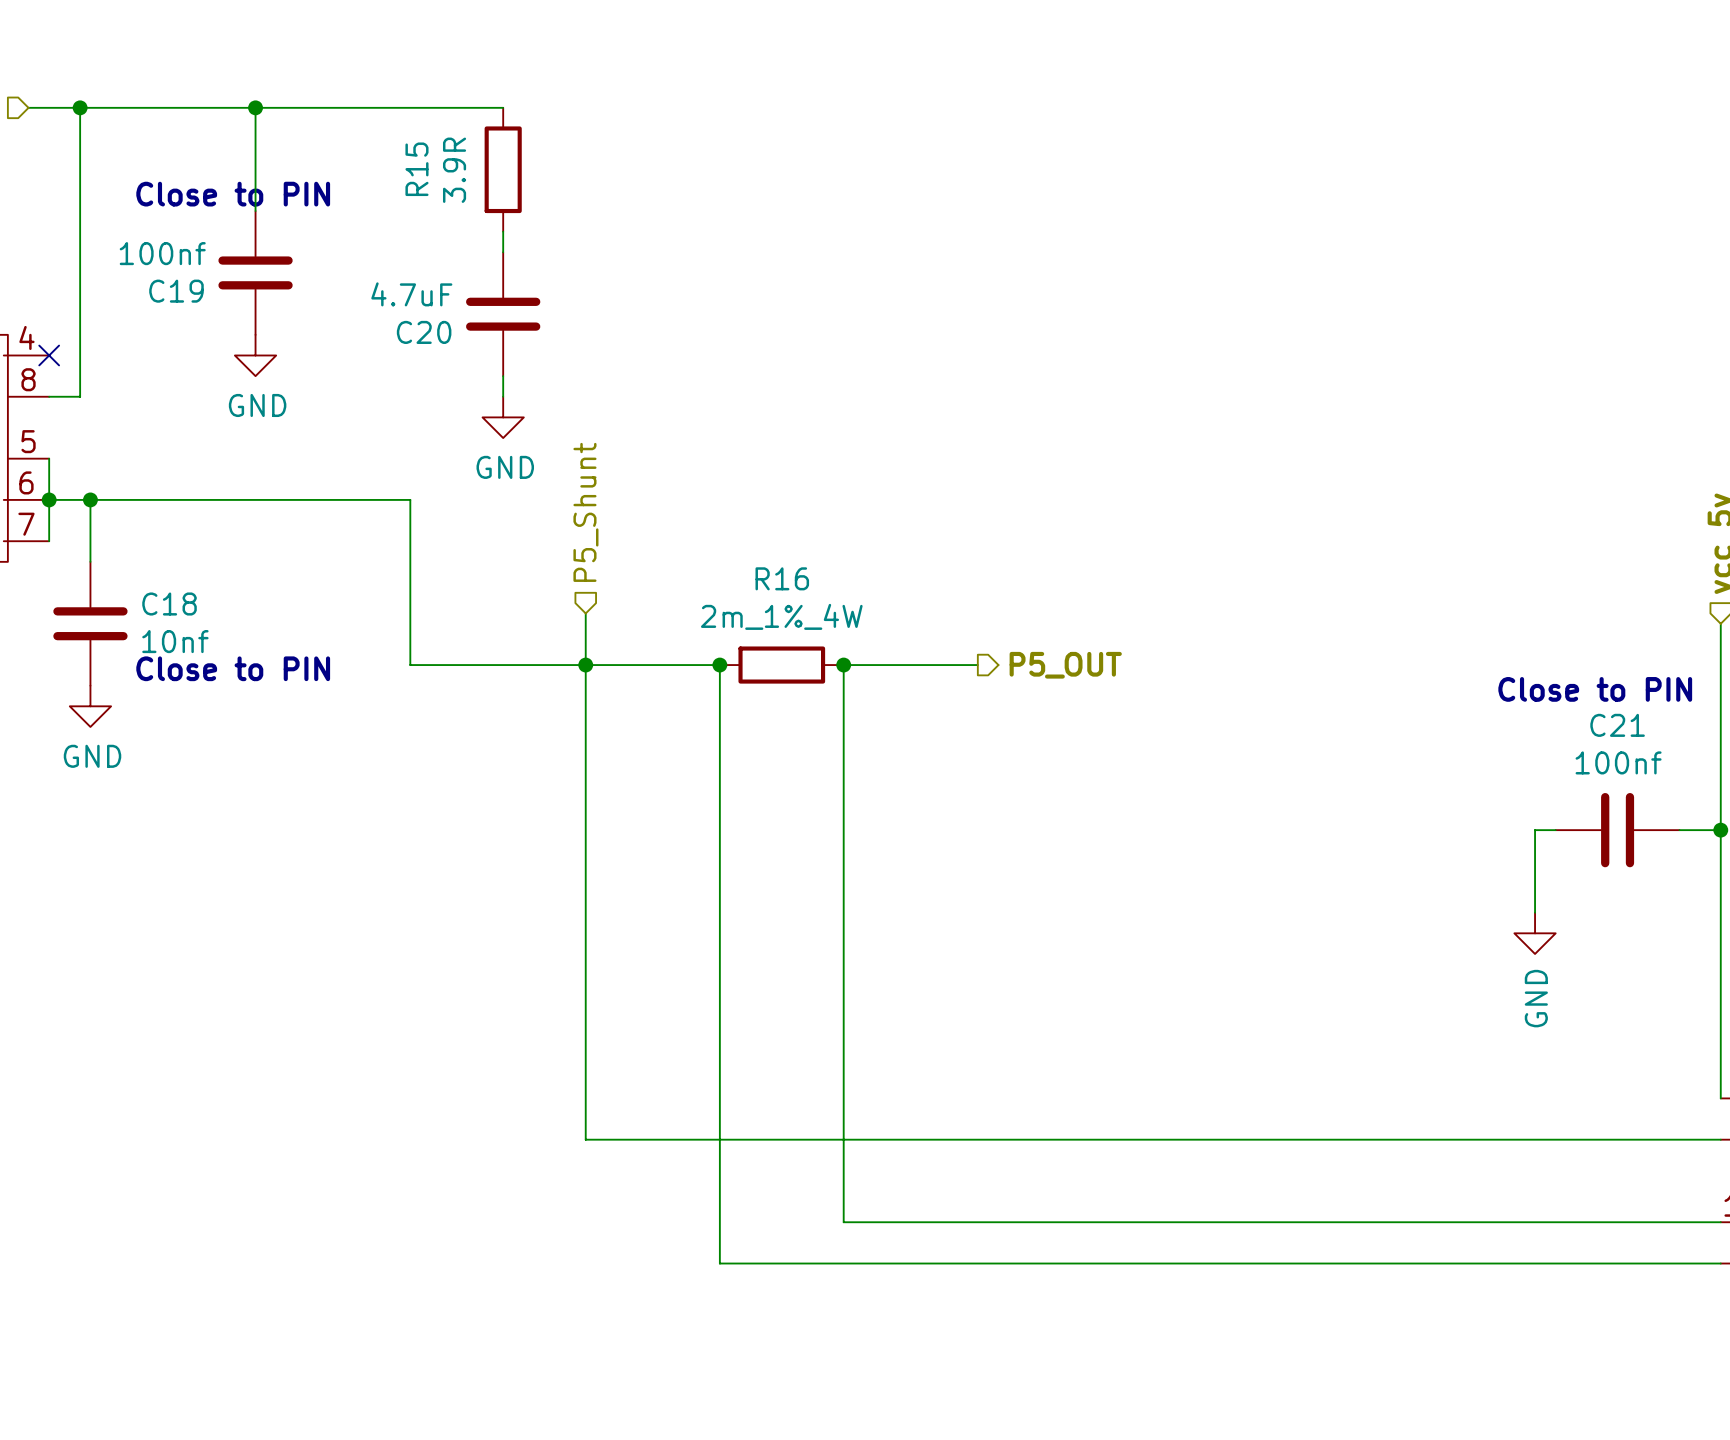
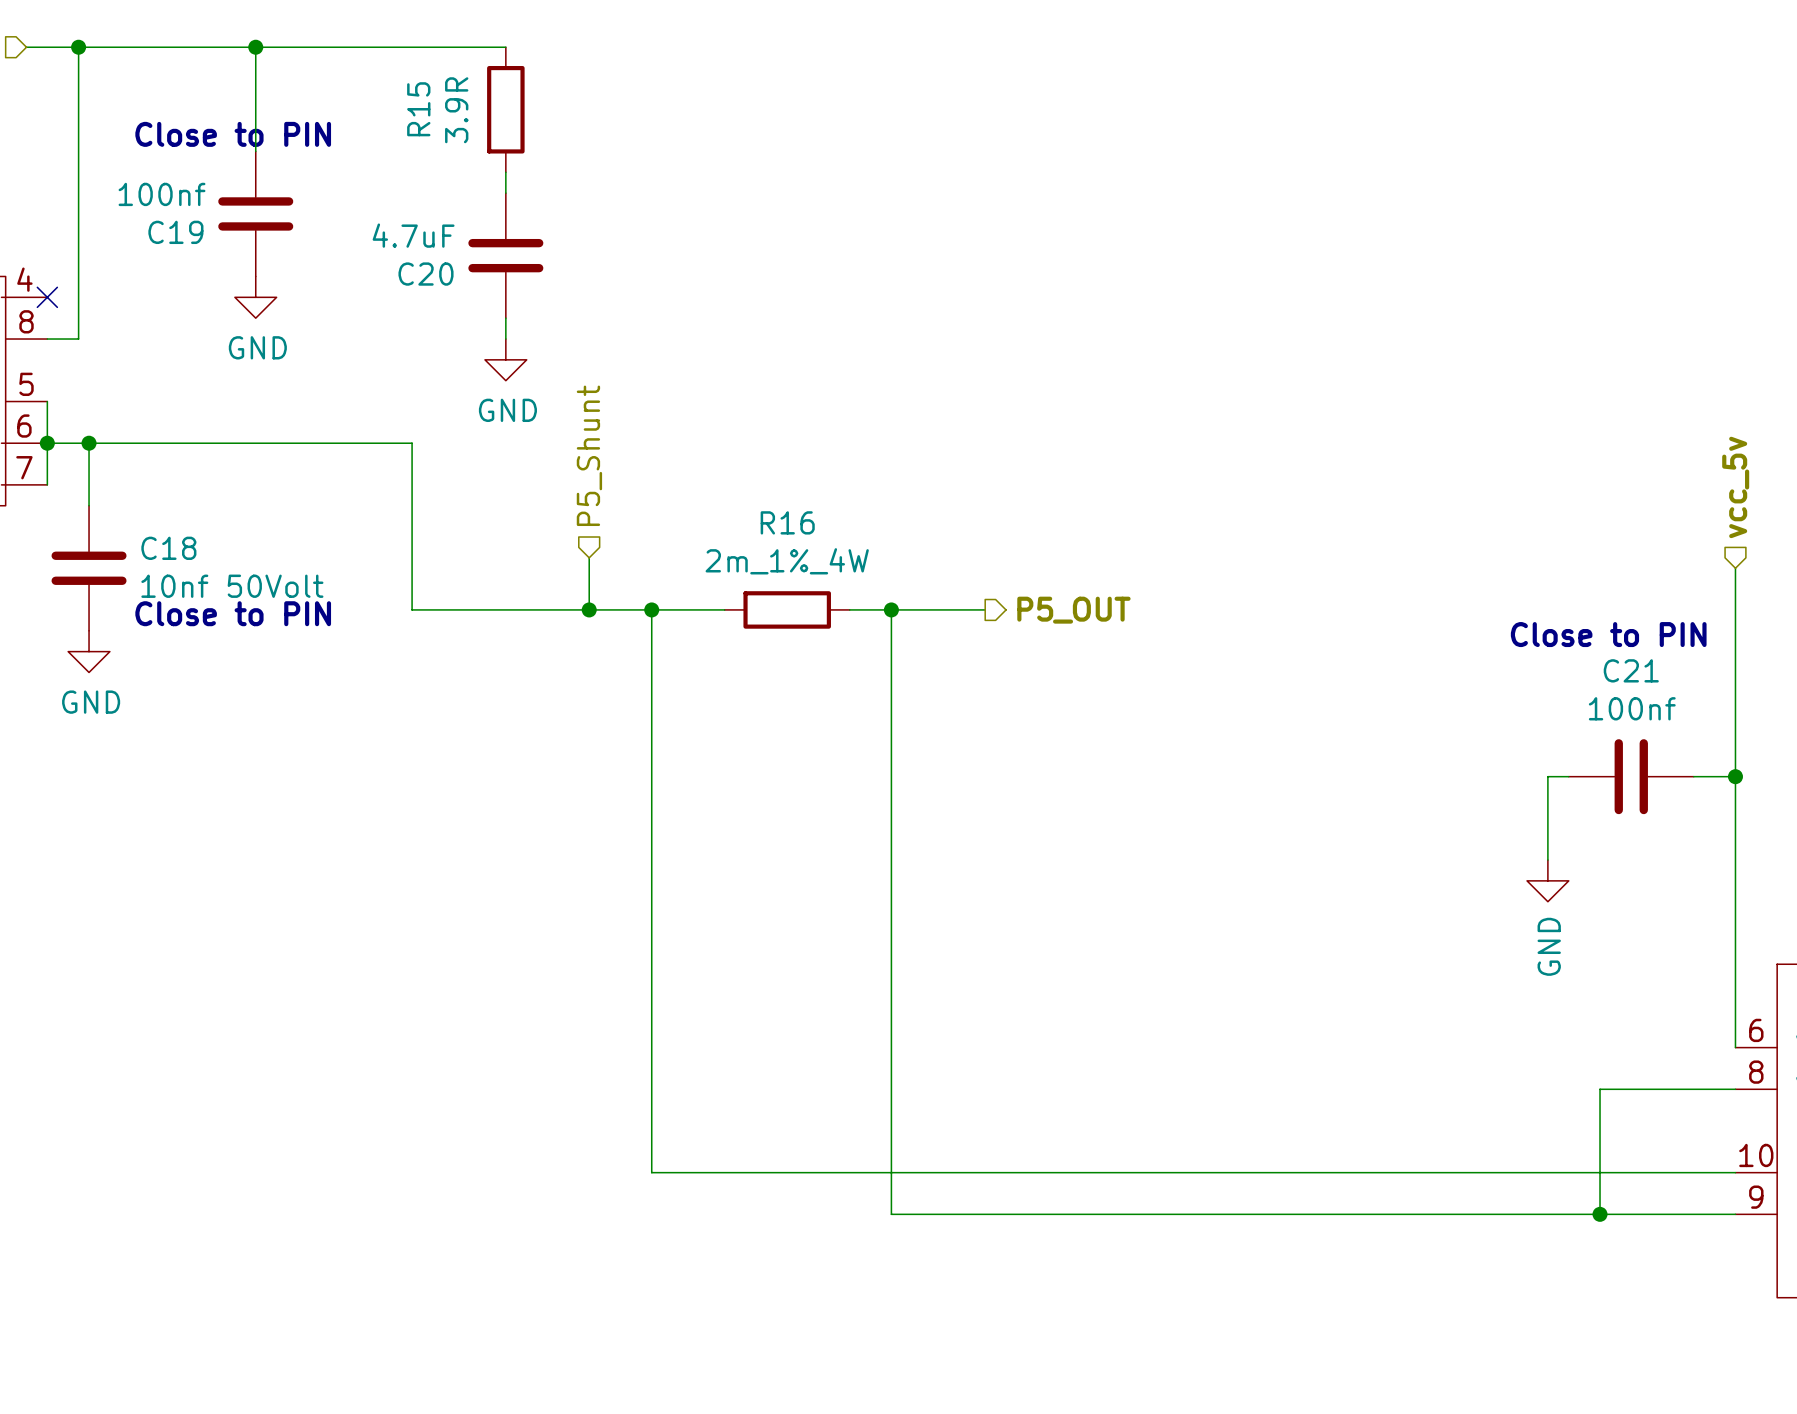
C18 value: 10nf (175, 641) -> 10nf 50Volt (232, 586)
wire: (585, 665) (585, 1139) (1586, 1139) -> (1600, 1214) (1600, 1089)
wire: (719, 665) (719, 1263) (884, 1263) -> (891, 609) (891, 1214)
junction position: (719, 665) -> (651, 609)
wire: (843, 665) (843, 1222) -> (651, 609) (651, 1172) (849, 1172)
junction position: (843, 665) -> (891, 609)
junction: none -> (1600, 1214)

